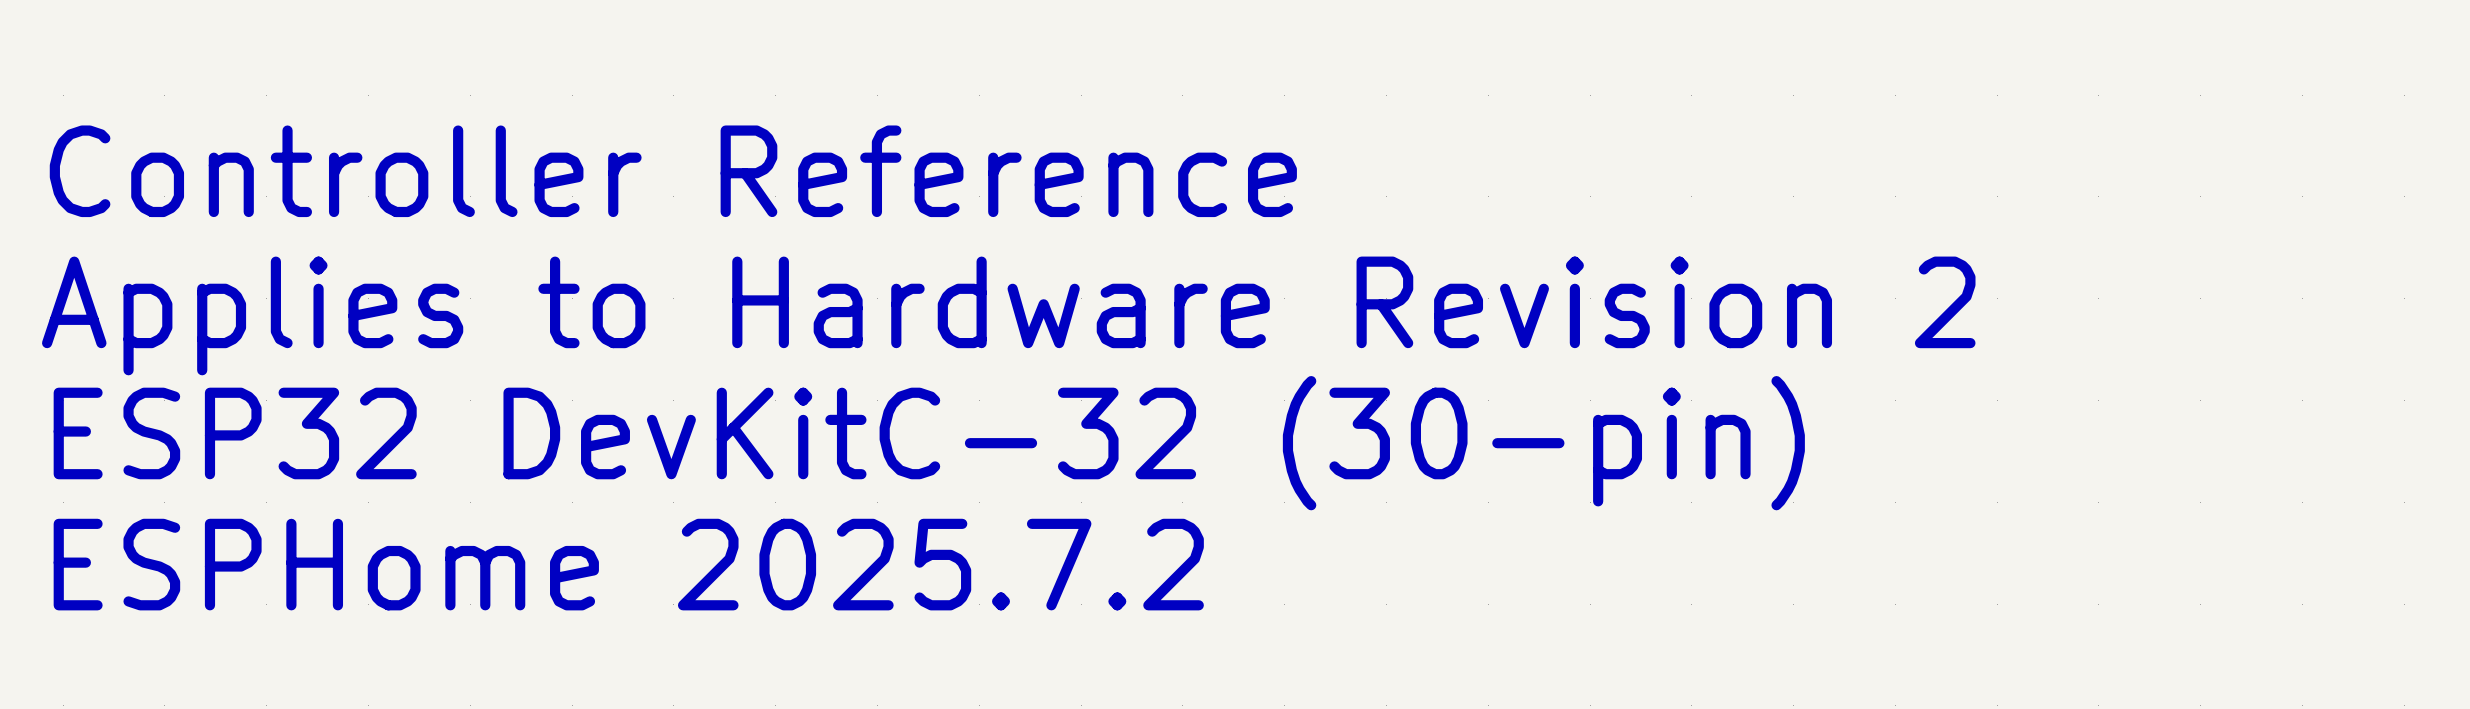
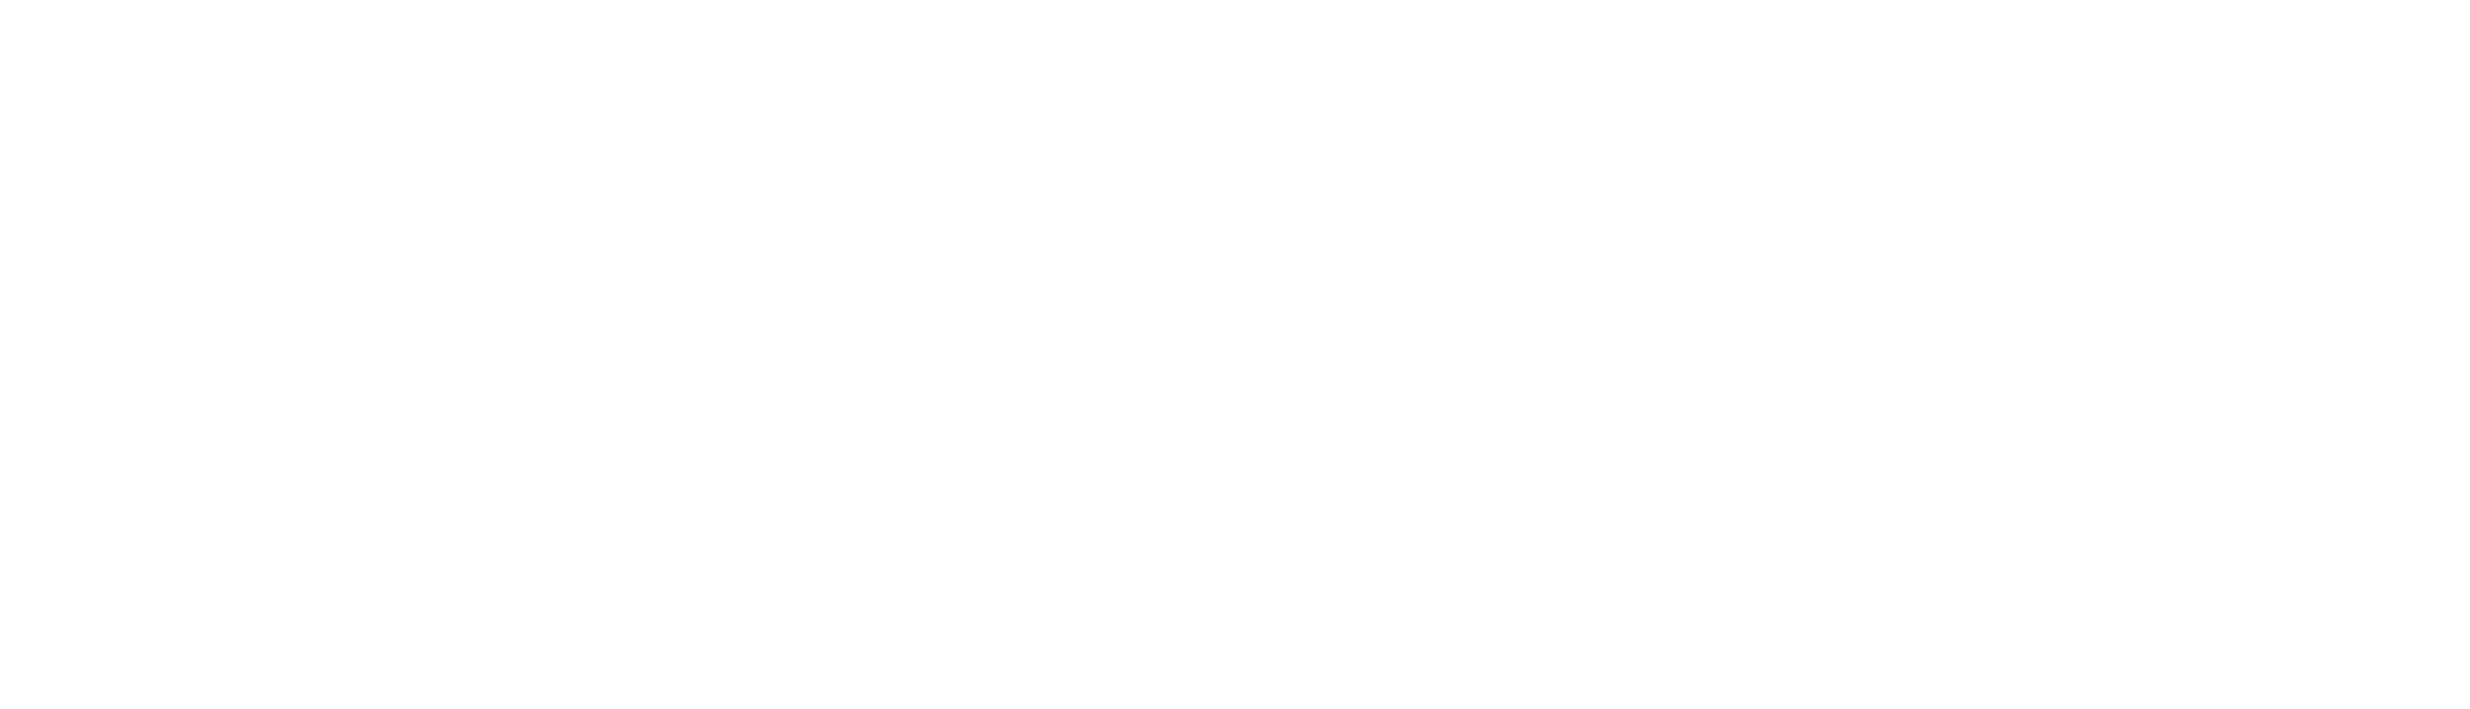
text: Controller Reference (673, 171) -> none
text: Applies to Hardware Revision 2 (1008, 315) -> none
text: ESP32 DevKitC-32 (30-pin) (929, 443) -> none
text: ESPHome 2025.7.2 (628, 564) -> none

